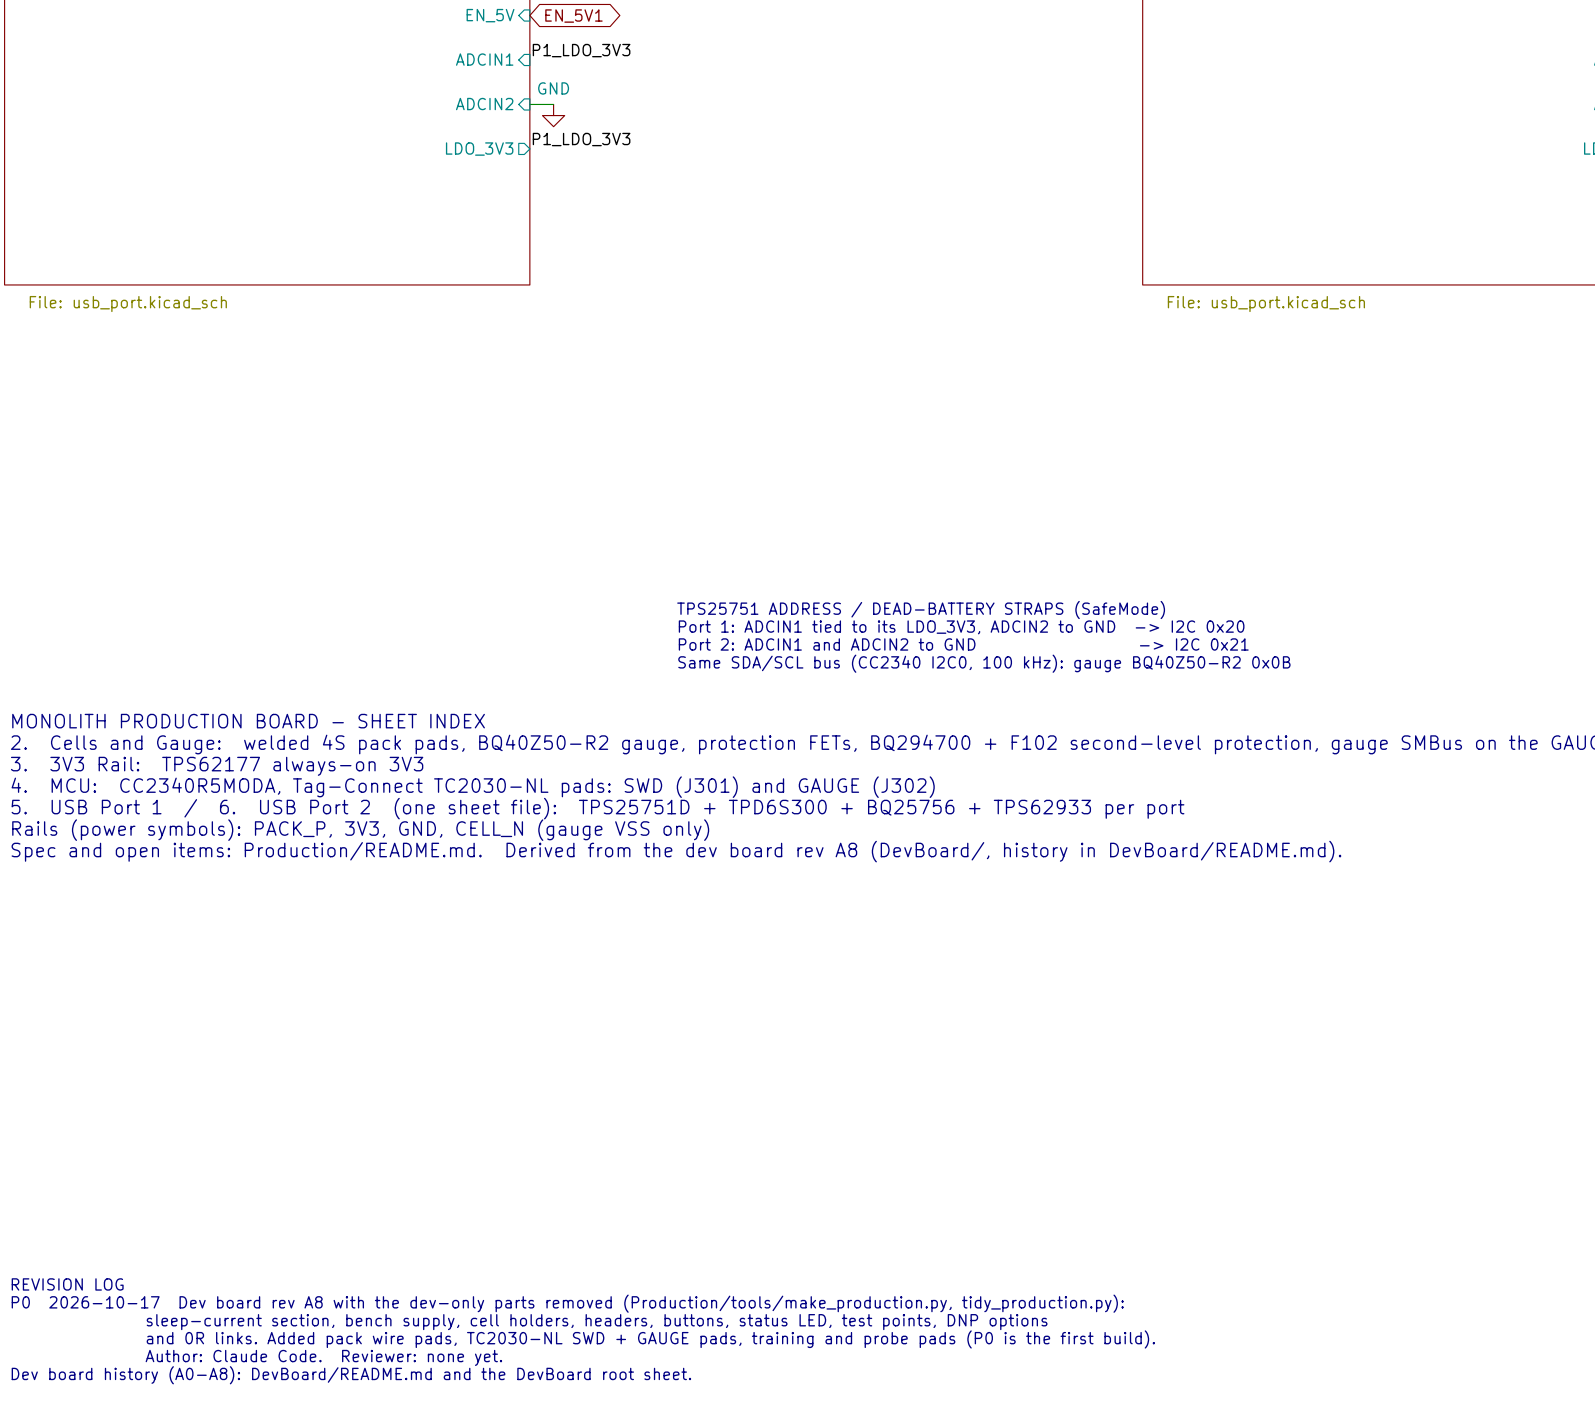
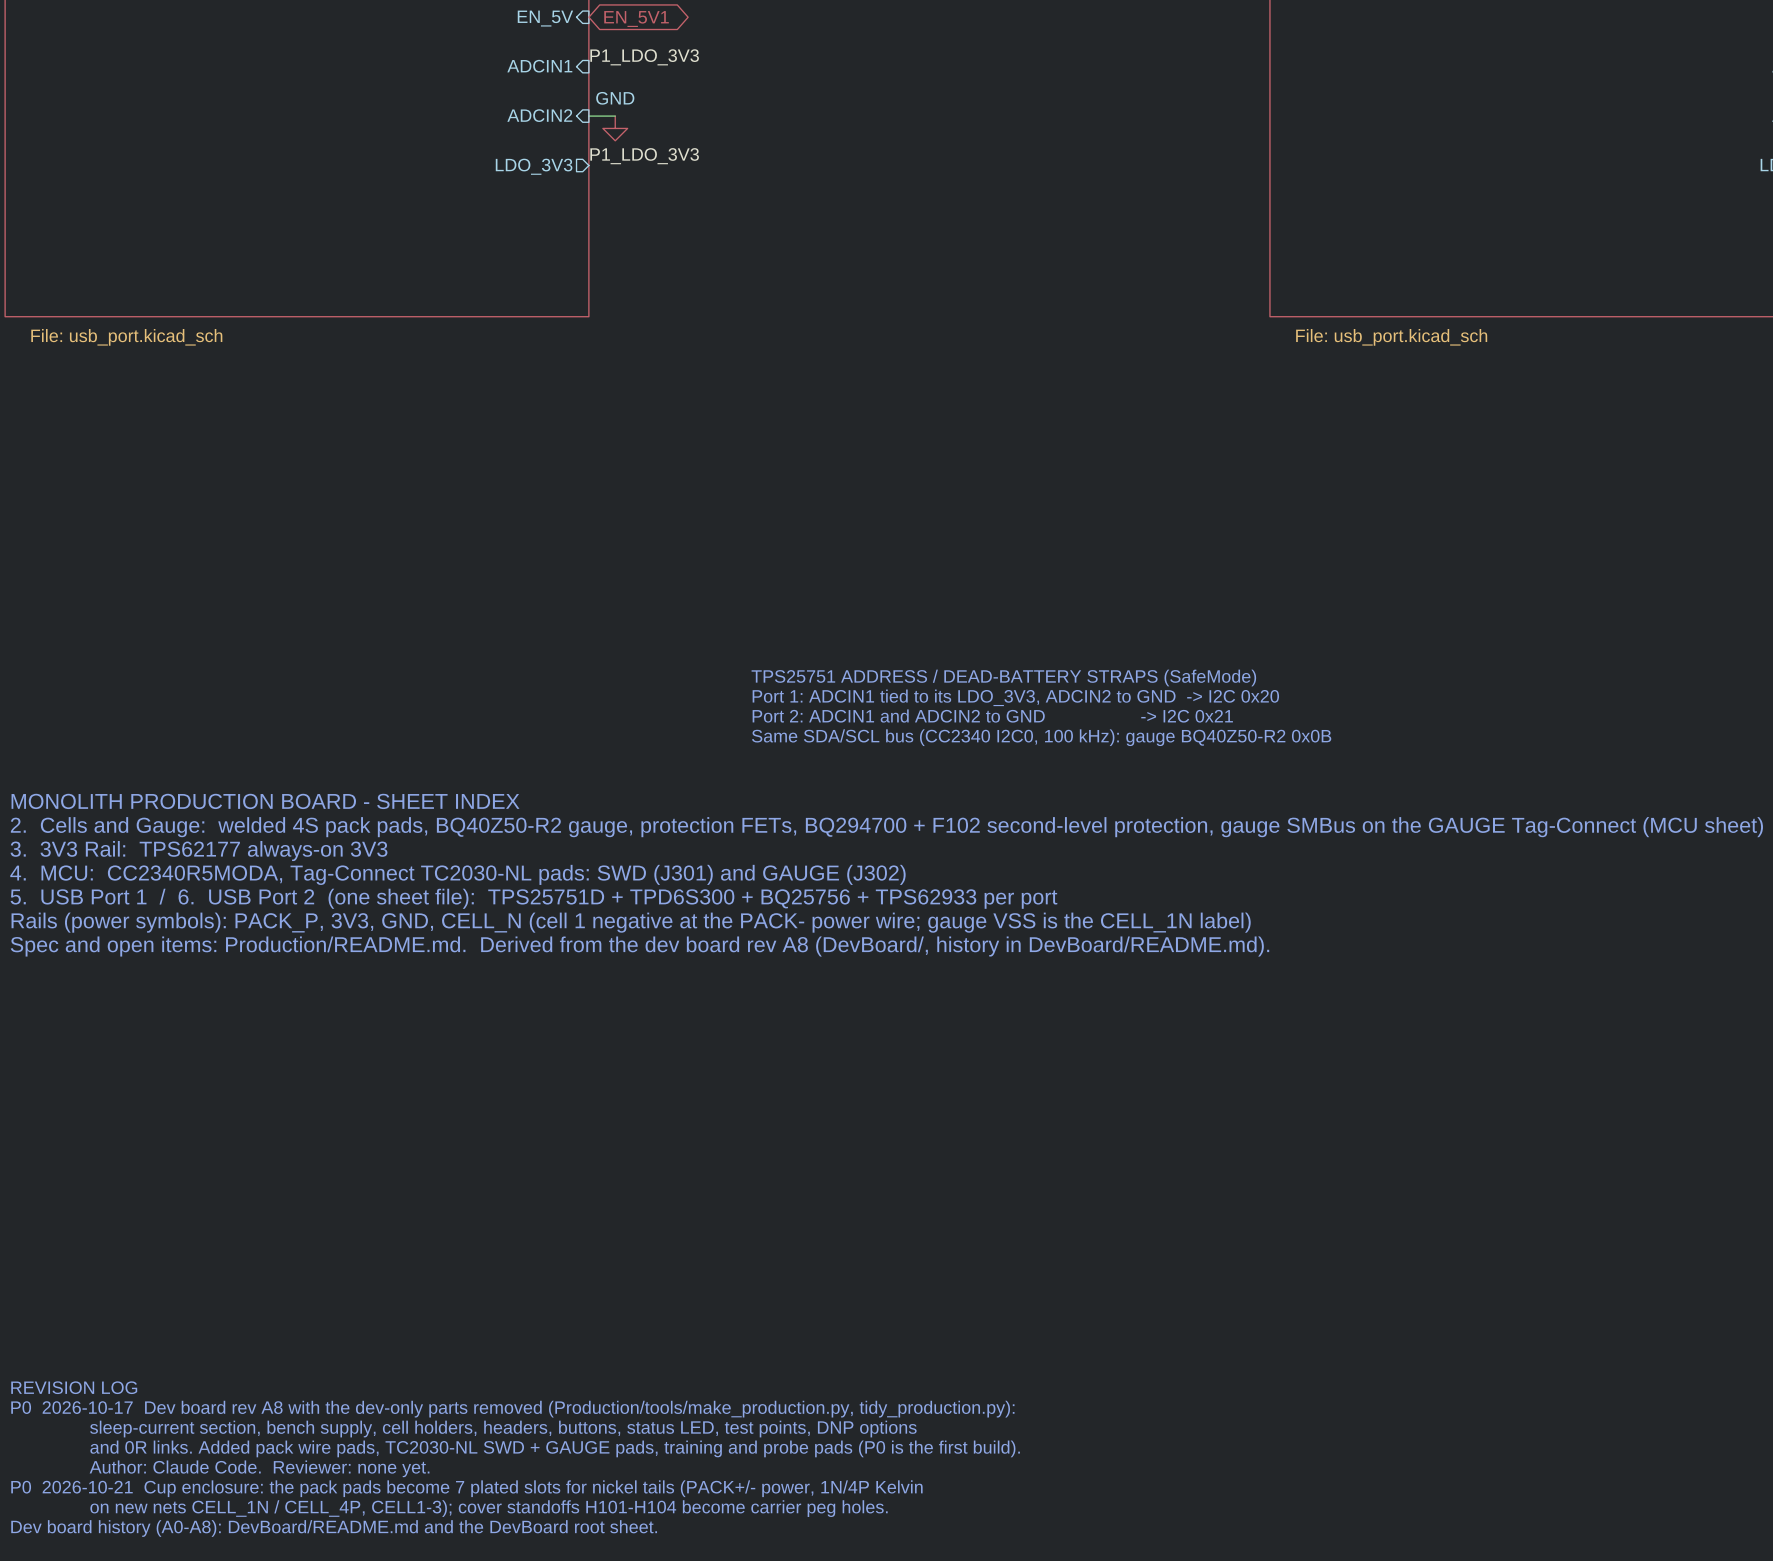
text: Rails (power symbols): PACK_P, 3V3, GND, CELL_N (gauge VSS only) (360, 830) -> Rails (power symbols): PACK_P, 3V3, GND, CELL_N (cell 1 negative at the PACK- power wire; gauge VSS is the CELL_1N label) (631, 922)
text: none -> REVISION LOG (74, 1387)
text: none -> P0 2026-10-17 Dev board rev A8 with the dev-only parts removed (Production/tools/make_production.py, tidy_production.py): (512, 1409)
text: REVISION LOG (67, 1284) -> sleep-current section, bench supply, cell holders, headers, buttons, status LED, test points, DNP options (503, 1429)
text: P0 2026-10-17 Dev board rev A8 with the dev-only parts removed (Production/tools/make_production.py, tidy_production.py): (567, 1303) -> and 0R links. Added pack wire pads, TC2030-NL SWD + GAUGE pads, training and probe pads (P0 is the first build). (555, 1448)
text: sleep-current section, bench supply, cell holders, headers, buttons, status LED, test points, DNP options (597, 1322) -> Author: Claude Code. Reviewer: none yet. (259, 1468)
text: and 0R links. Added pack wire pads, TC2030-NL SWD + GAUGE pads, training and probe pads (P0 is the first build). (650, 1339) -> P0 2026-10-21 Cup enclosure: the pack pads become 7 plated slots for nickel tails (PACK+/- power, 1N/4P Kelvin (466, 1488)
text: Author: Claude Code. Reviewer: none yet. (323, 1357) -> on new nets CELL_1N / CELL_4P, CELL1-3); cover standoffs H101-H104 become carrier peg holes. (489, 1508)

